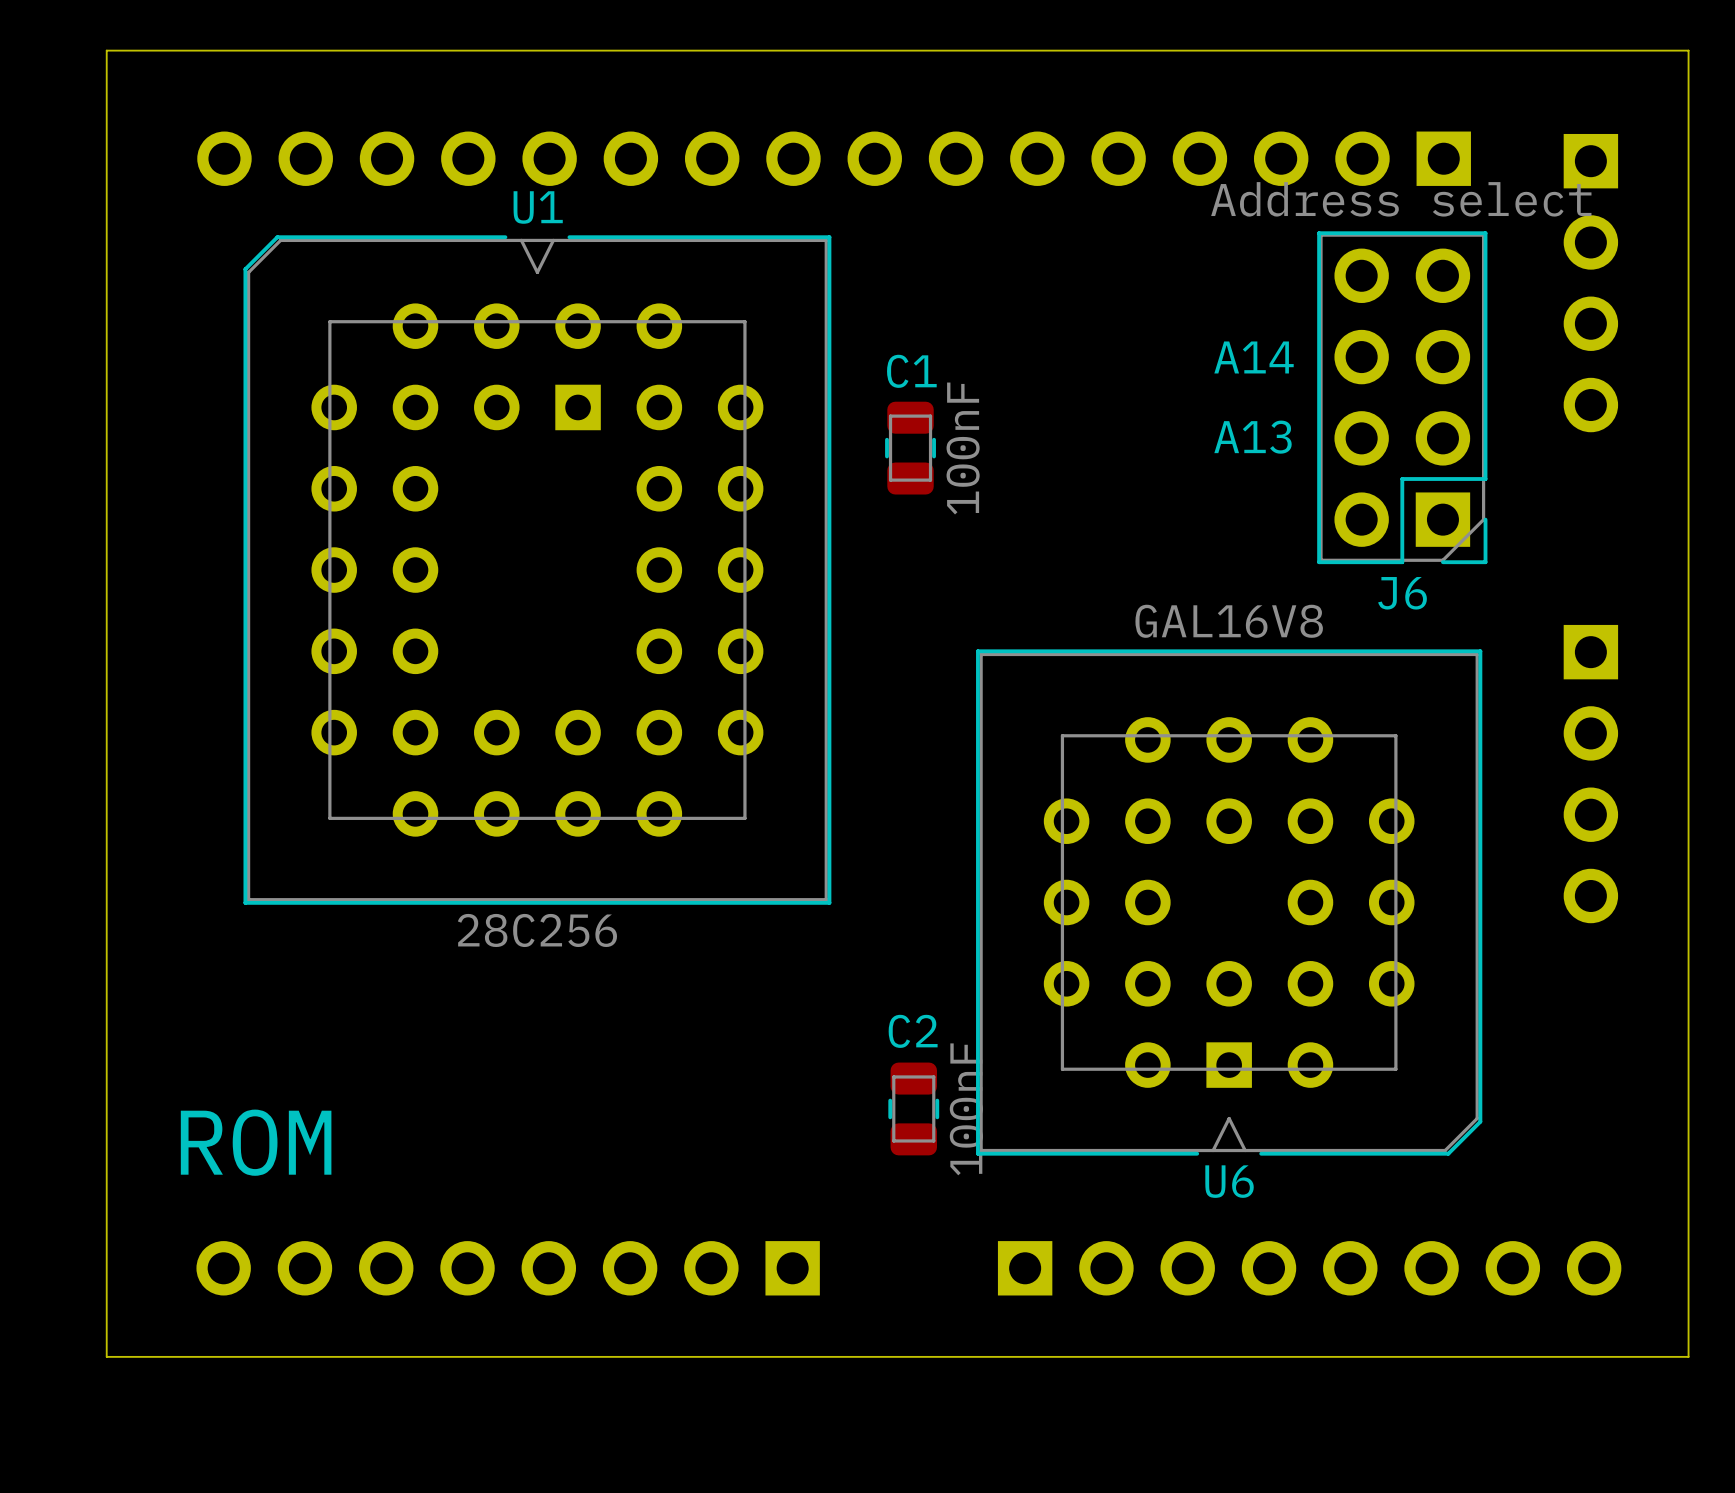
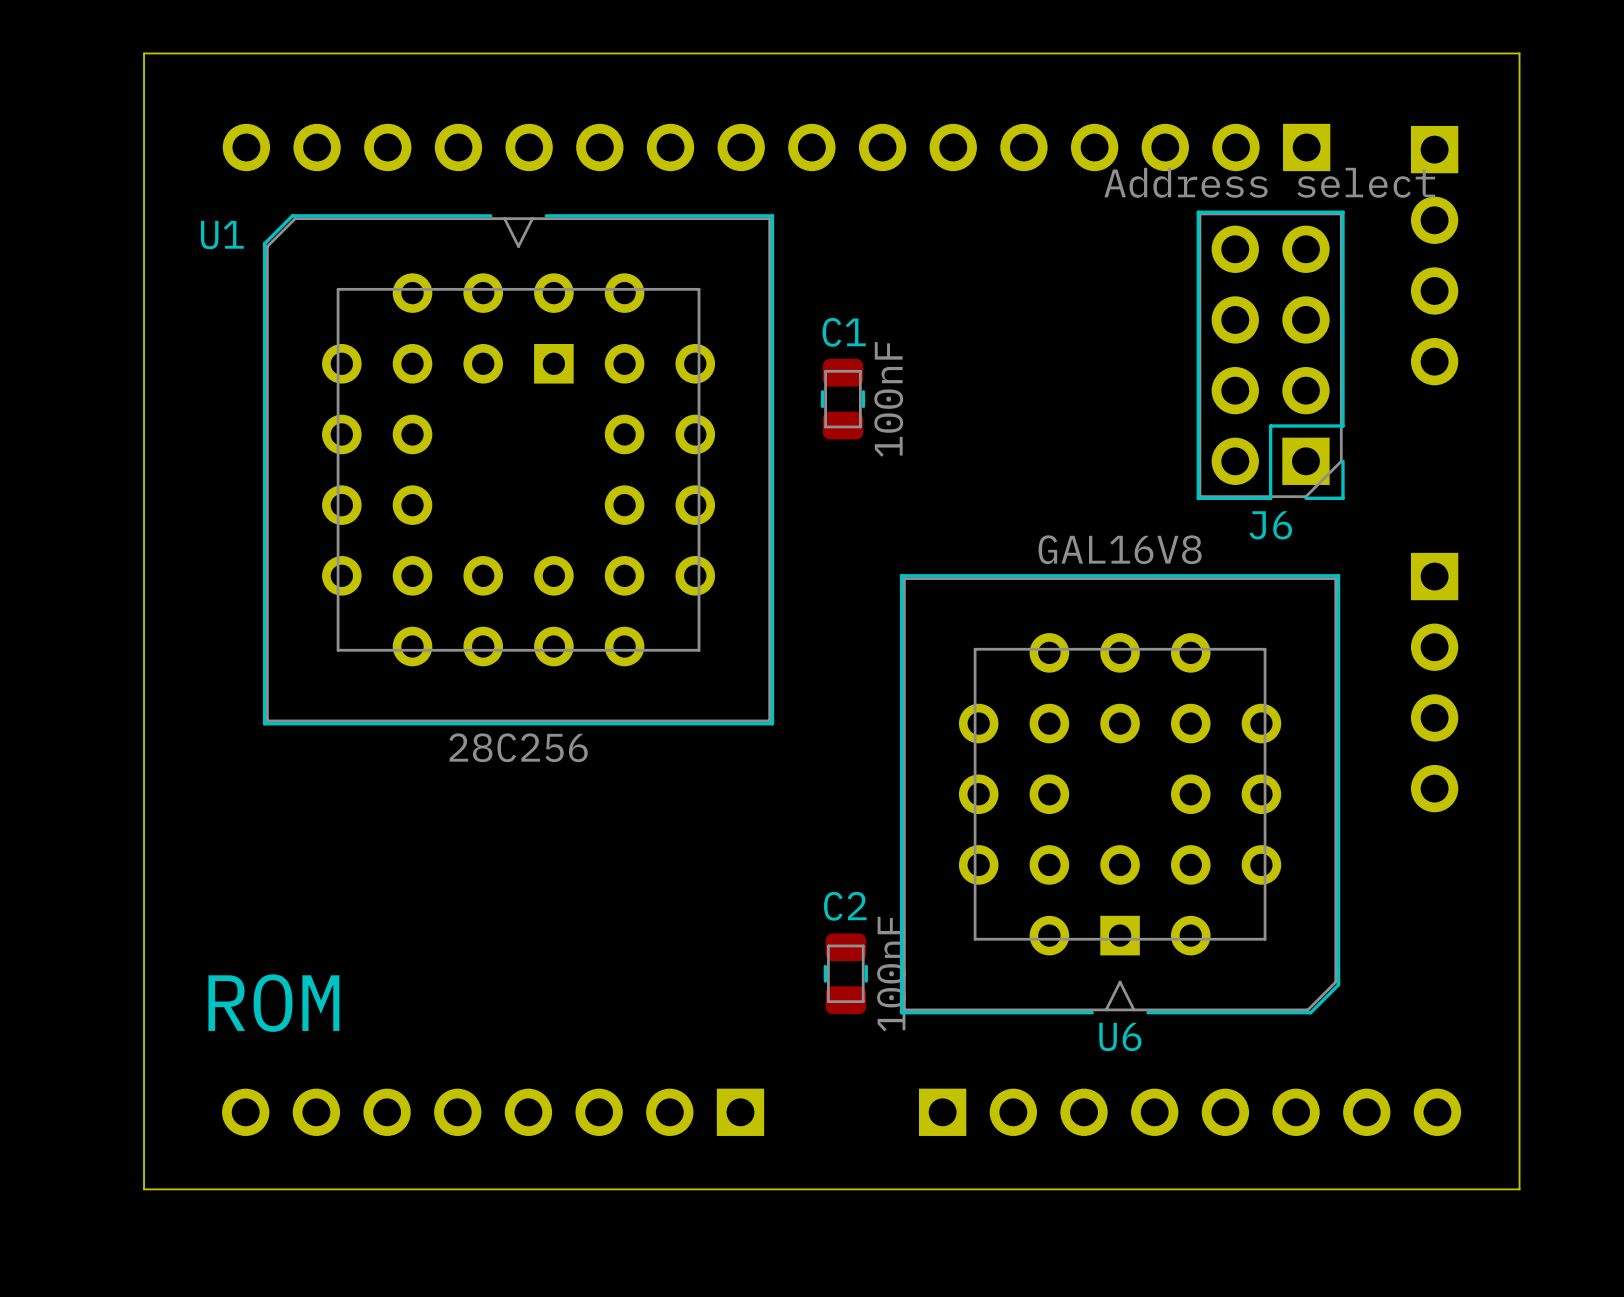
U1 name position: U1 (538, 207) -> U1 (222, 235)
U1 footprint: [243, 235, 832, 905] -> [262, 214, 775, 726]
text: A14 (1254, 357) -> none
text: A13 (1253, 437) -> none

